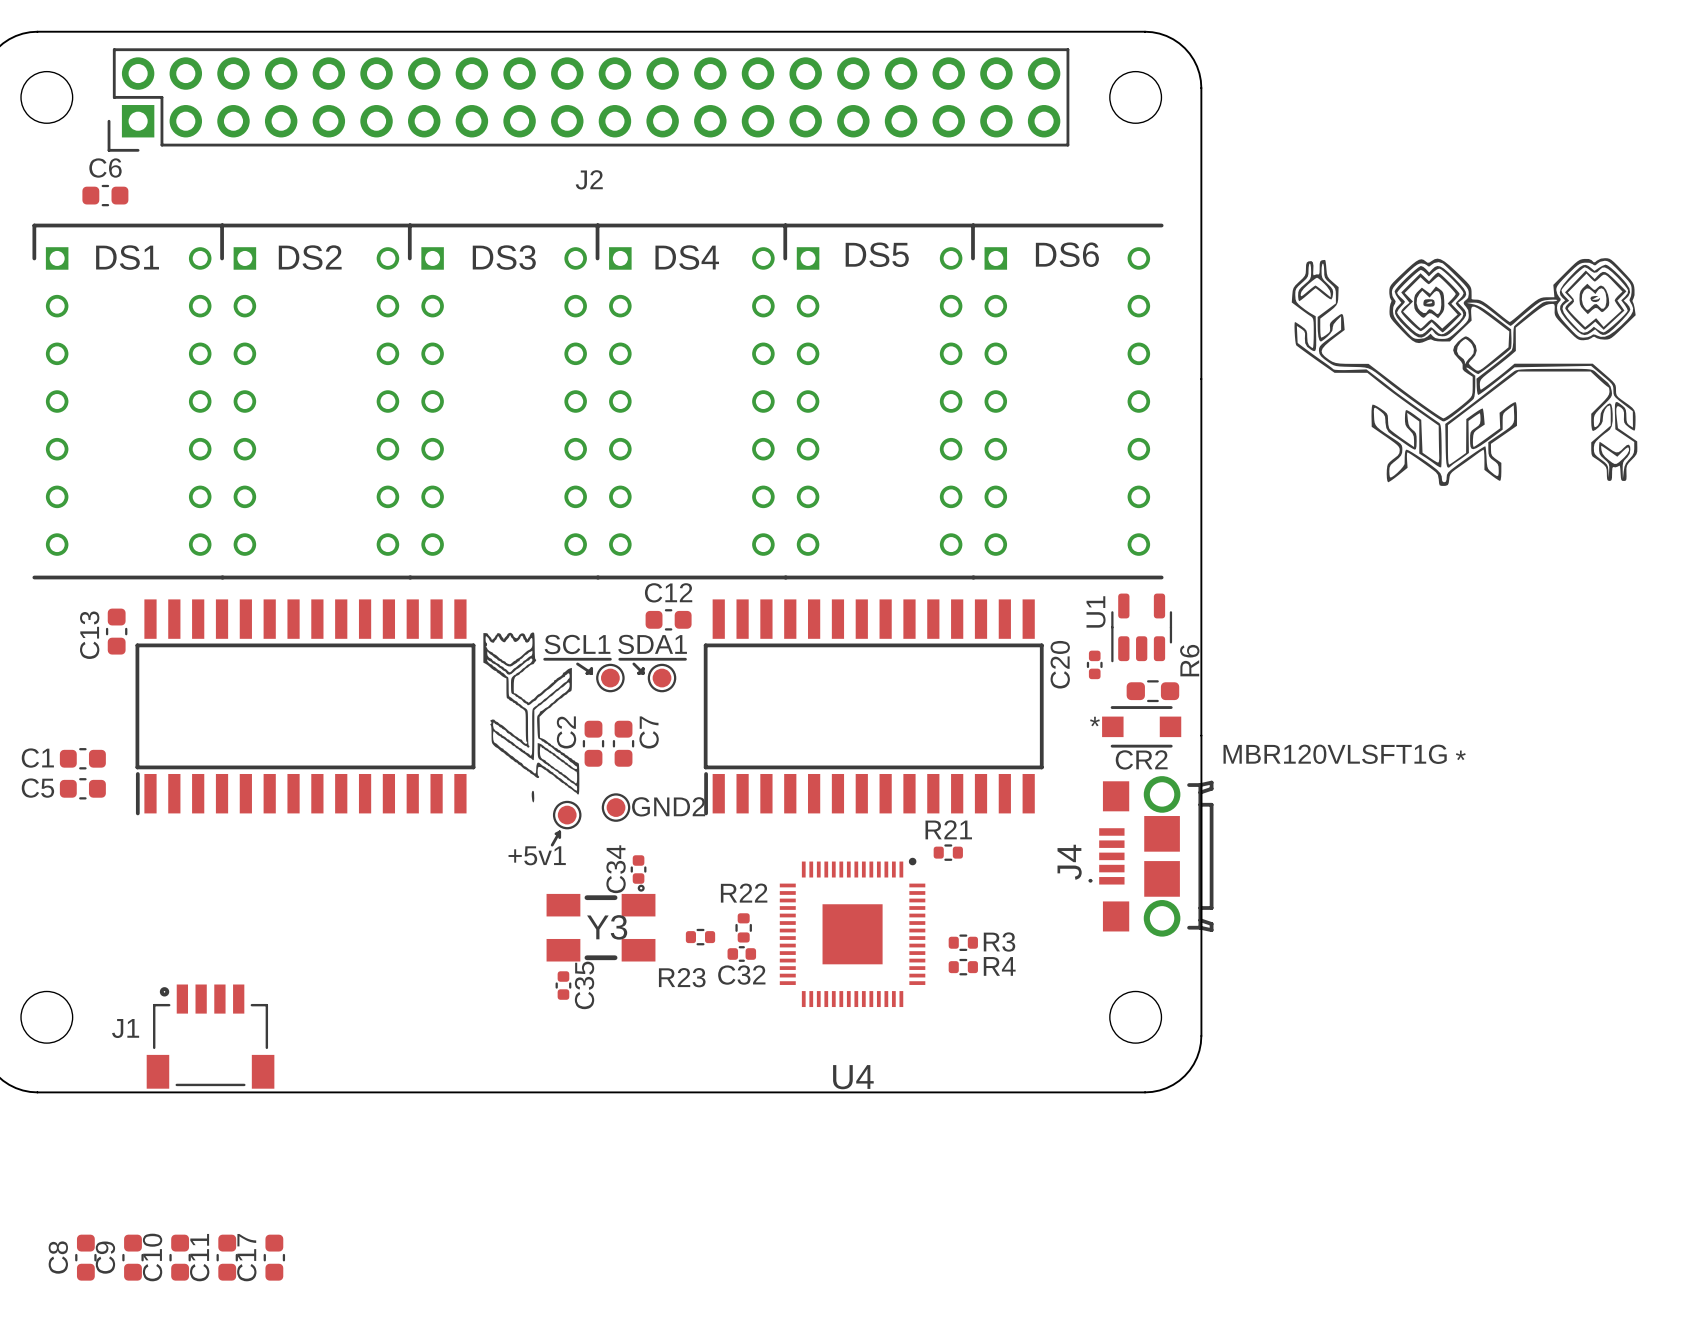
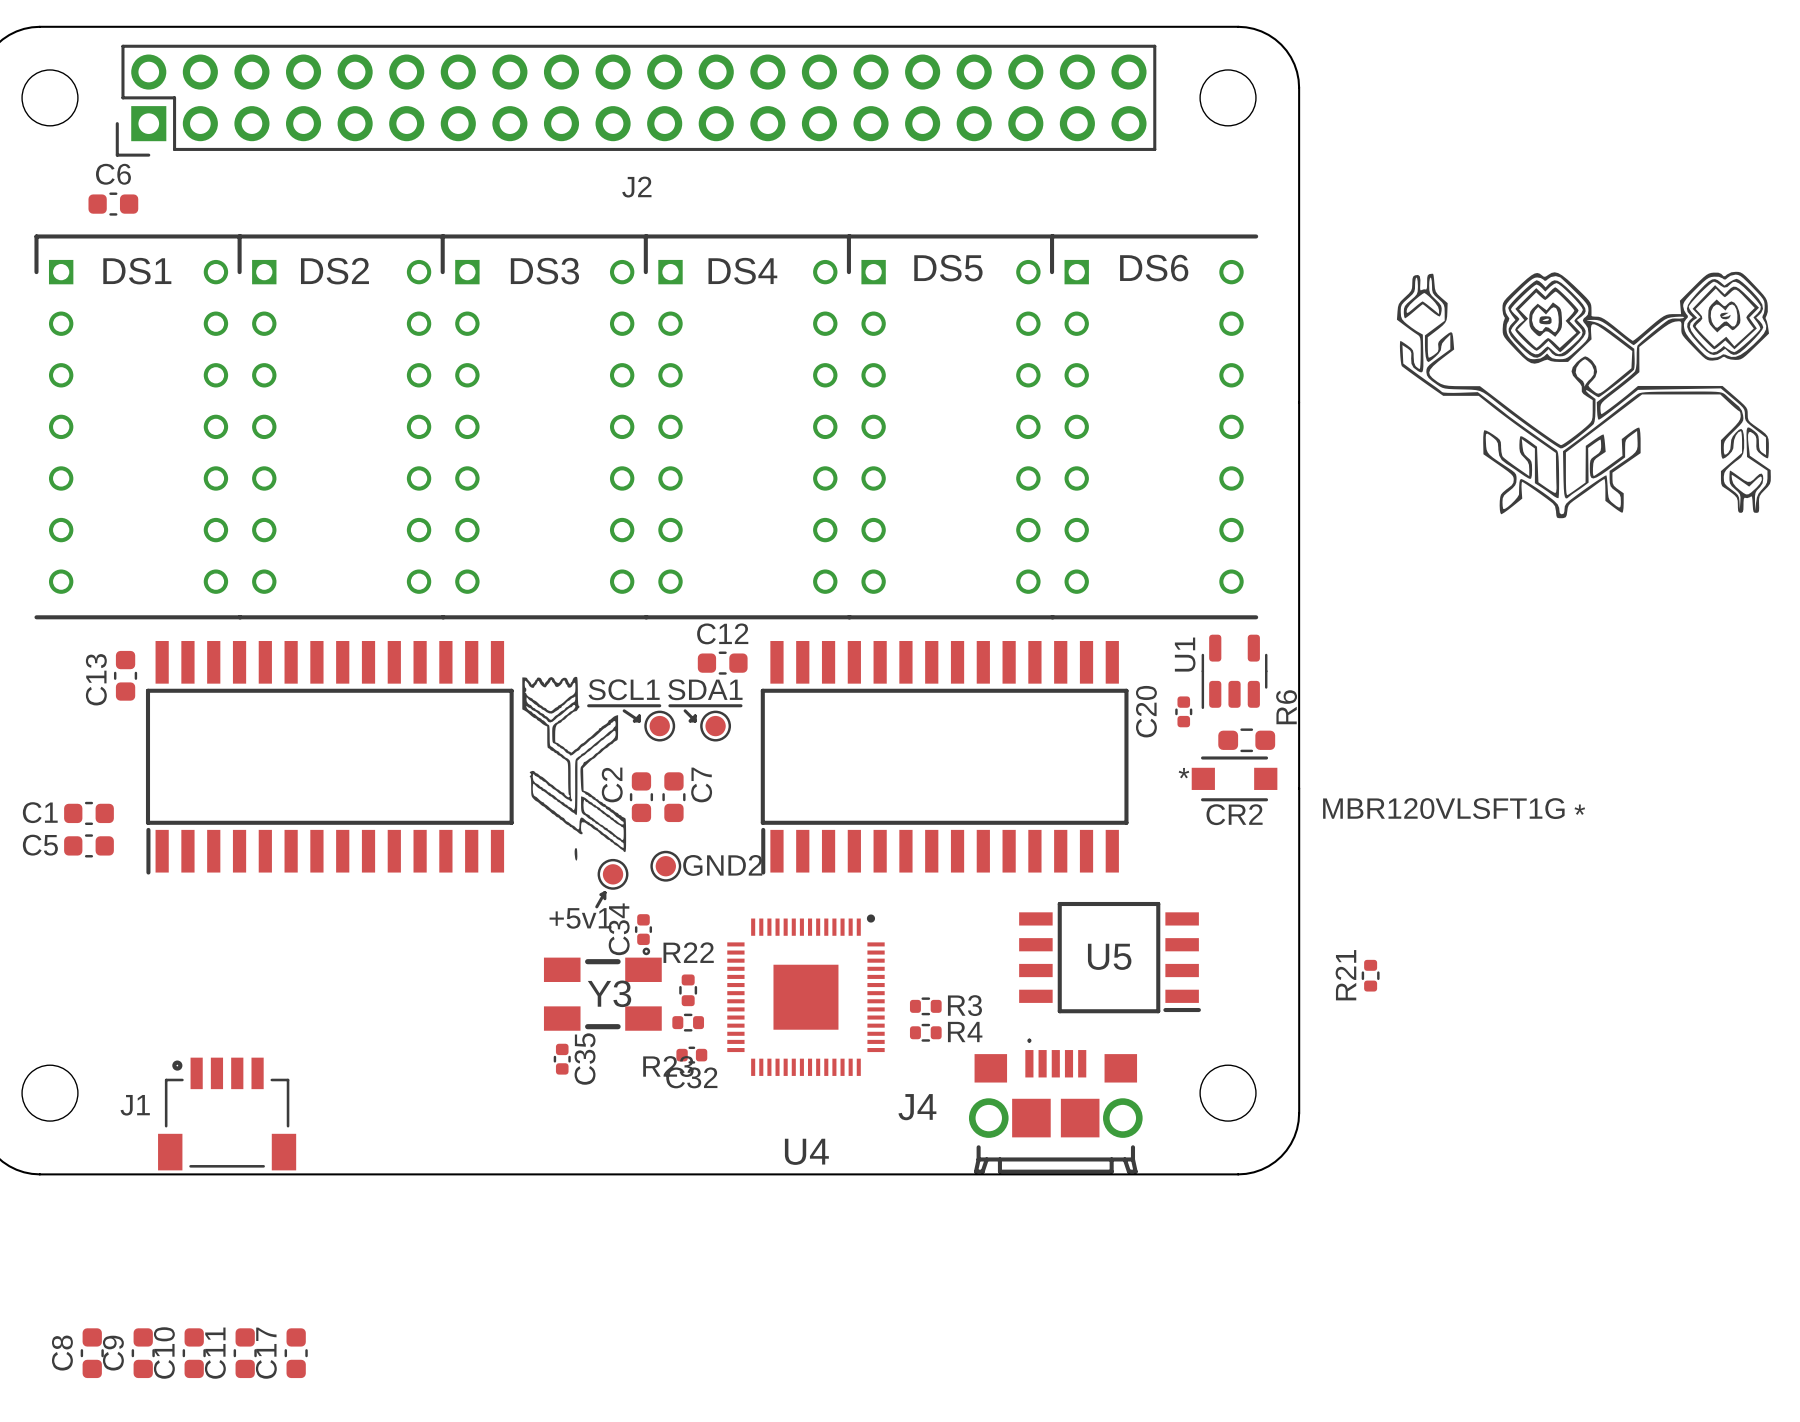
R21 rotation: 0° (948, 852) -> 90° clockwise (1370, 975)
R21 position: (948, 852) -> (1370, 975)
J4 rotation: 0° (1151, 856) -> 90° clockwise (1055, 1106)
J4 position: (1151, 856) -> (1055, 1106)
J4 name position: J4 (1069, 862) -> J4 (917, 1107)
C34 position: (638, 869) -> (643, 929)
U5: none -> (1110, 957)
Y3 position: (601, 923) -> (602, 989)
R22 position: (743, 927) -> (688, 990)
U4 position: (852, 932) -> (805, 995)
R23 position: (700, 937) -> (688, 1022)
R3 position: (963, 942) -> (925, 1006)
C32 position: (741, 953) -> (691, 1055)
R4 position: (963, 967) -> (925, 1032)
C35 position: (563, 985) -> (562, 1059)

